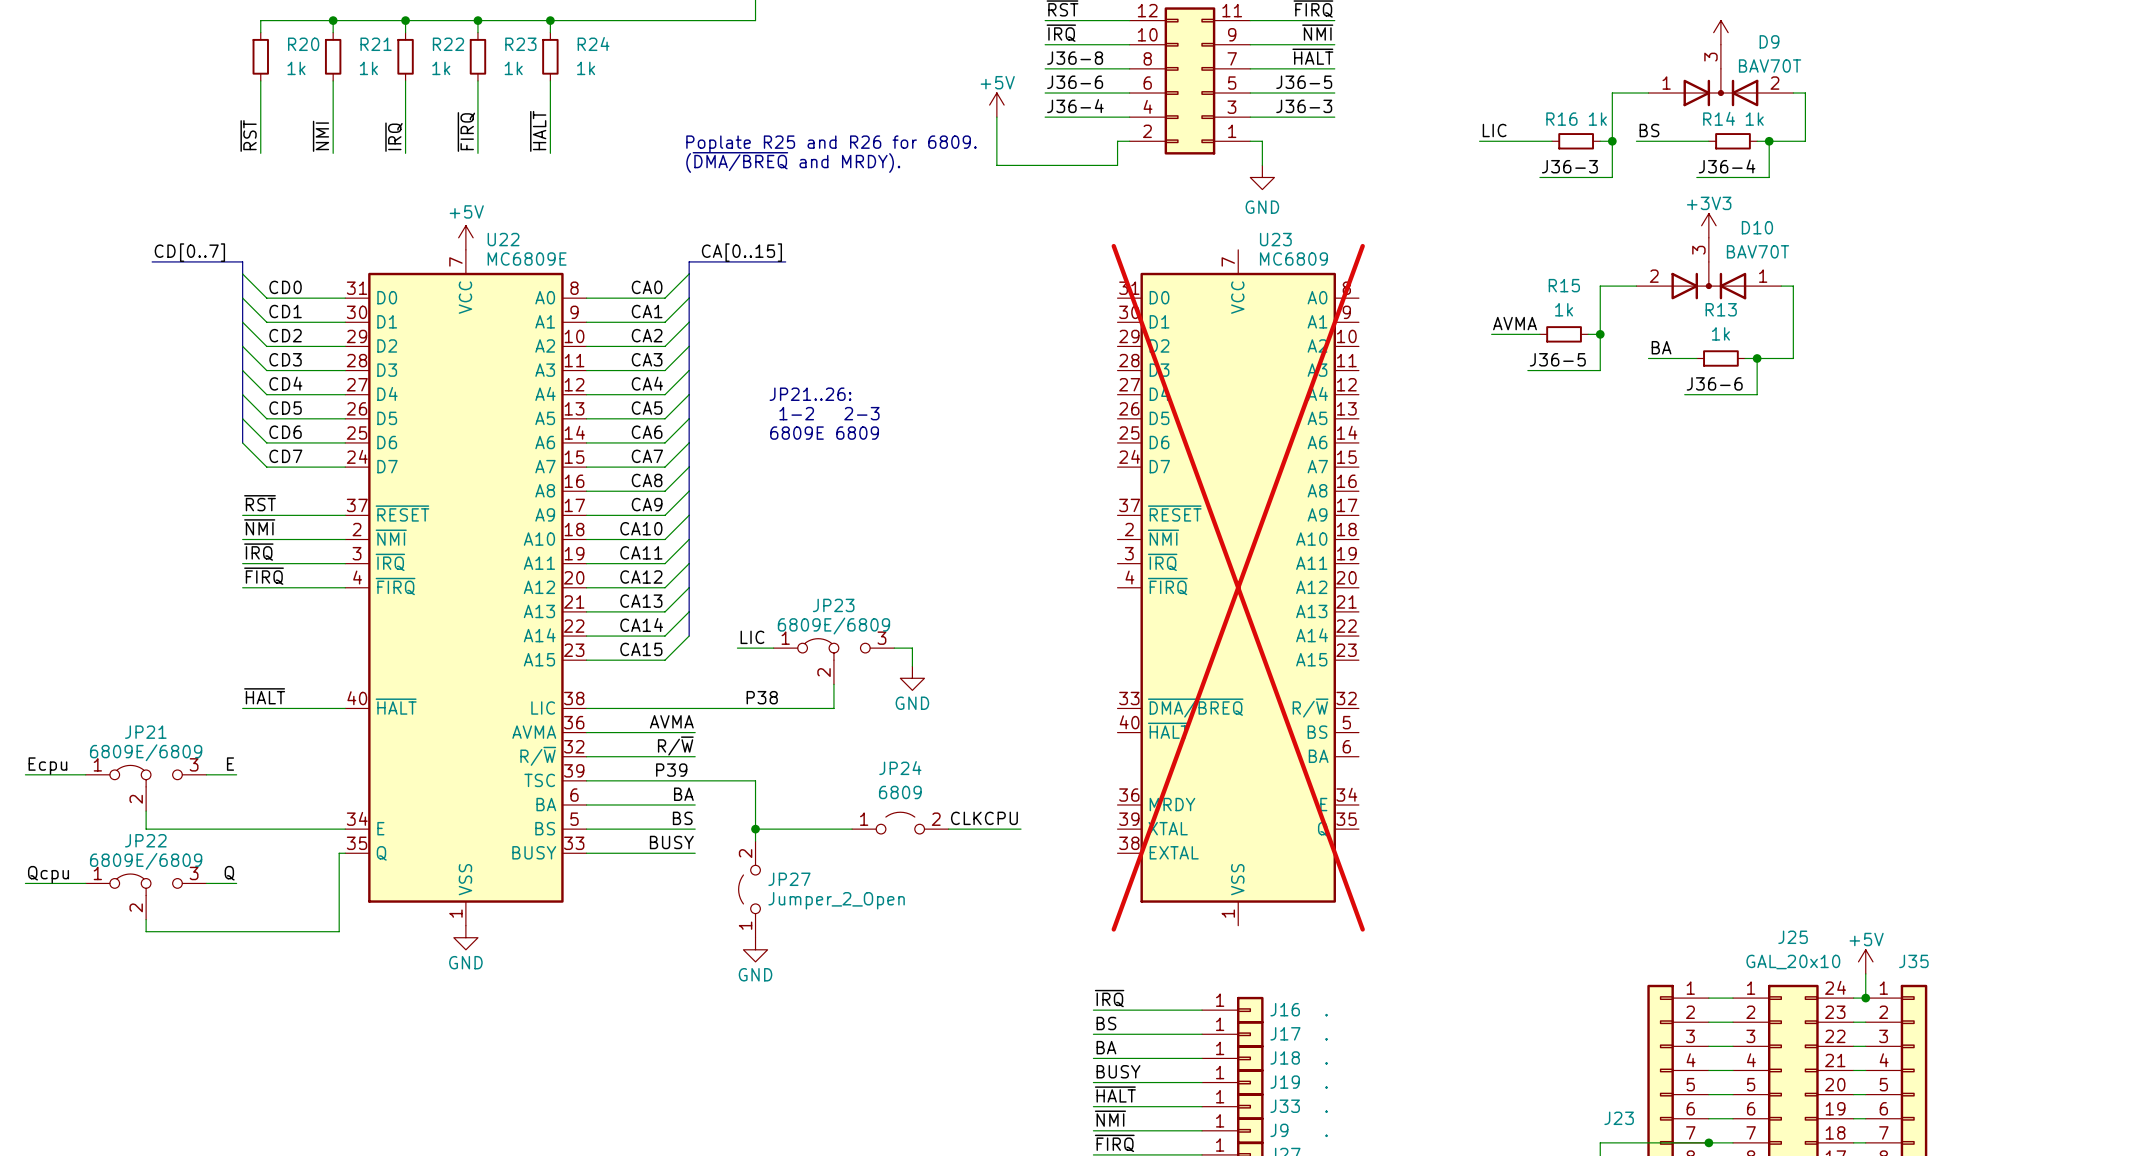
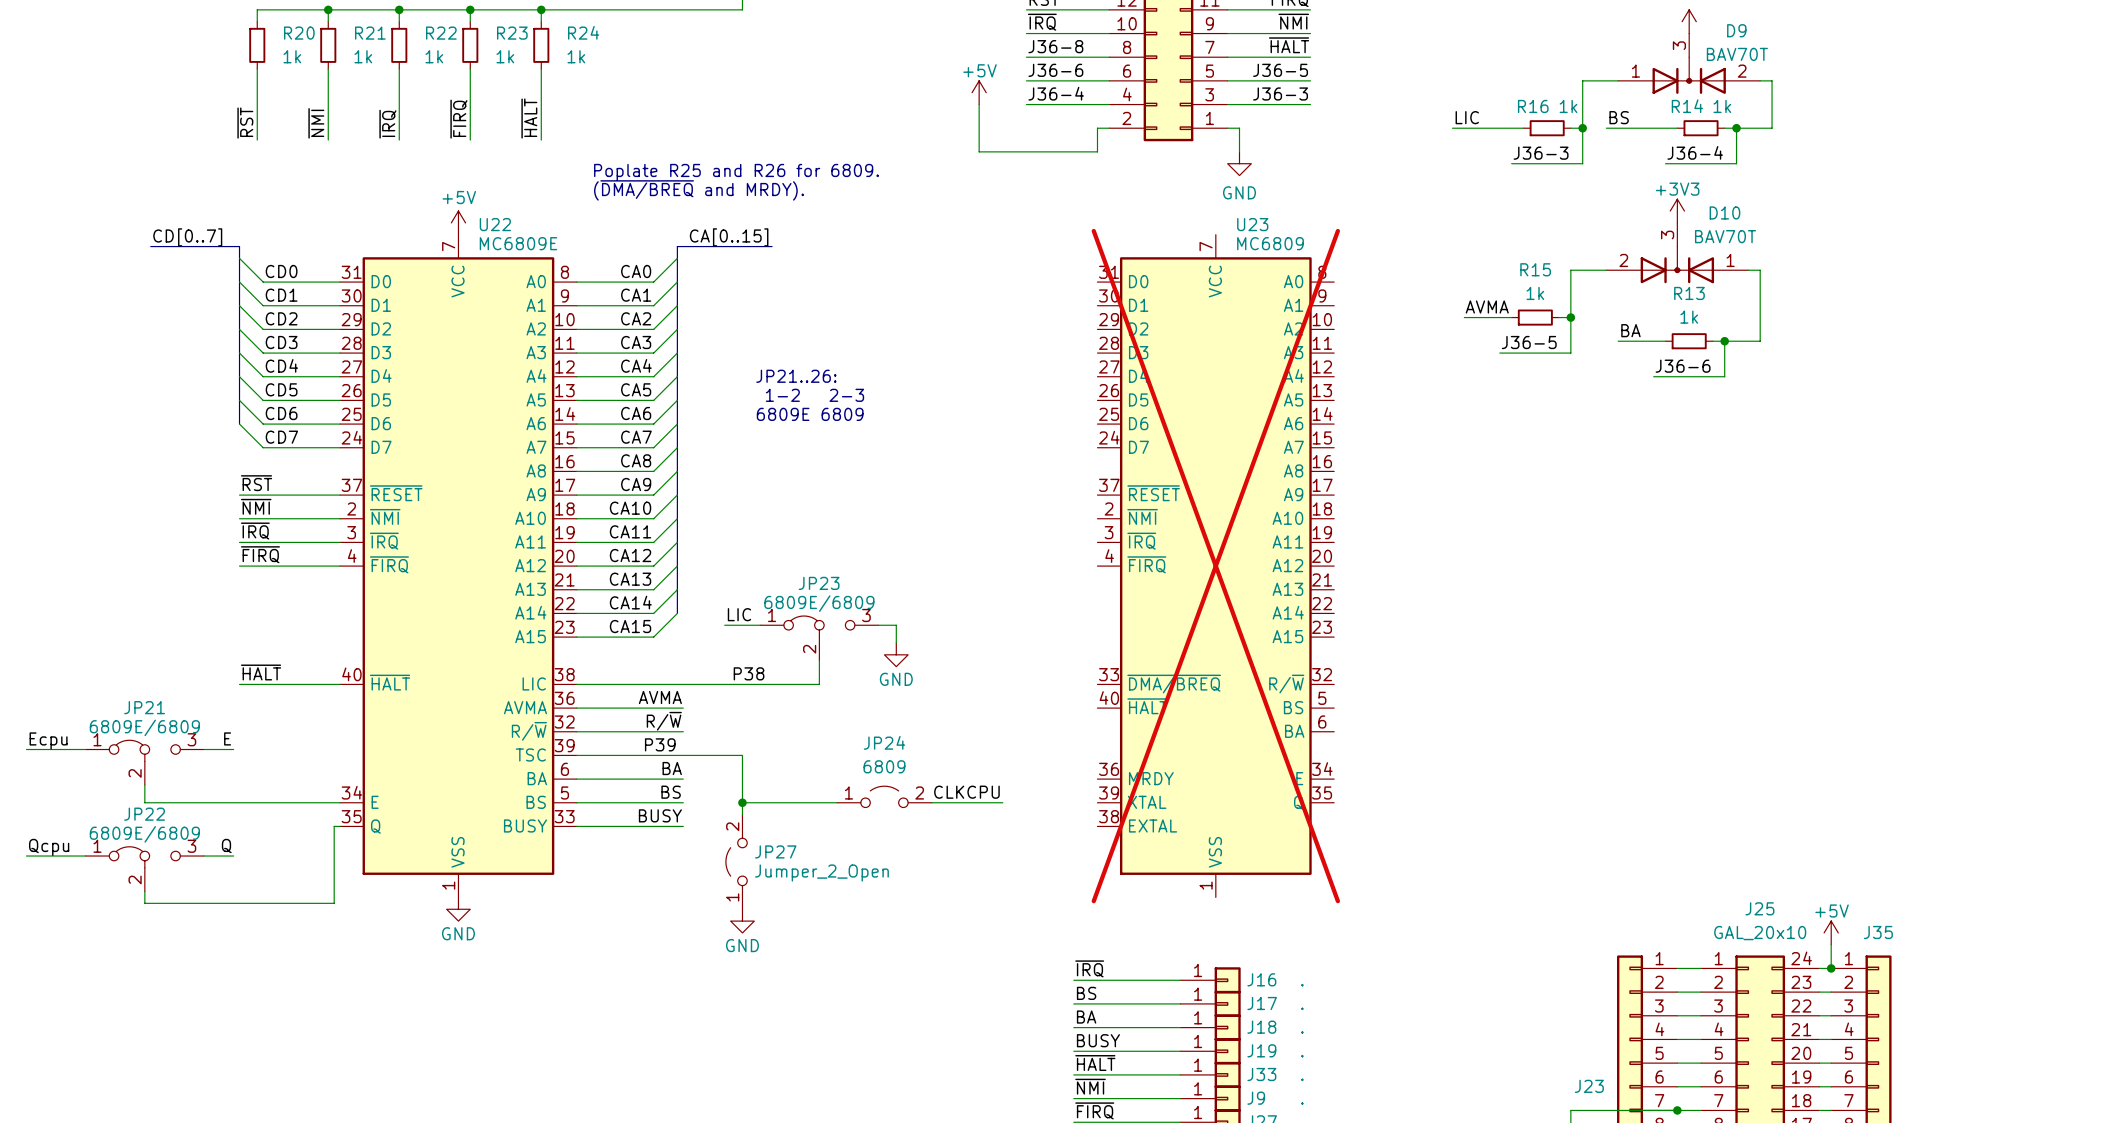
text position: Poplate R25 and R26 for 6809. (831, 144) -> Poplate R25 and R26 for 6809. (736, 172)
text position: (~{DMA/BREQ} and MRDY). (793, 162) -> (~{DMA/BREQ} and MRDY). (698, 190)

